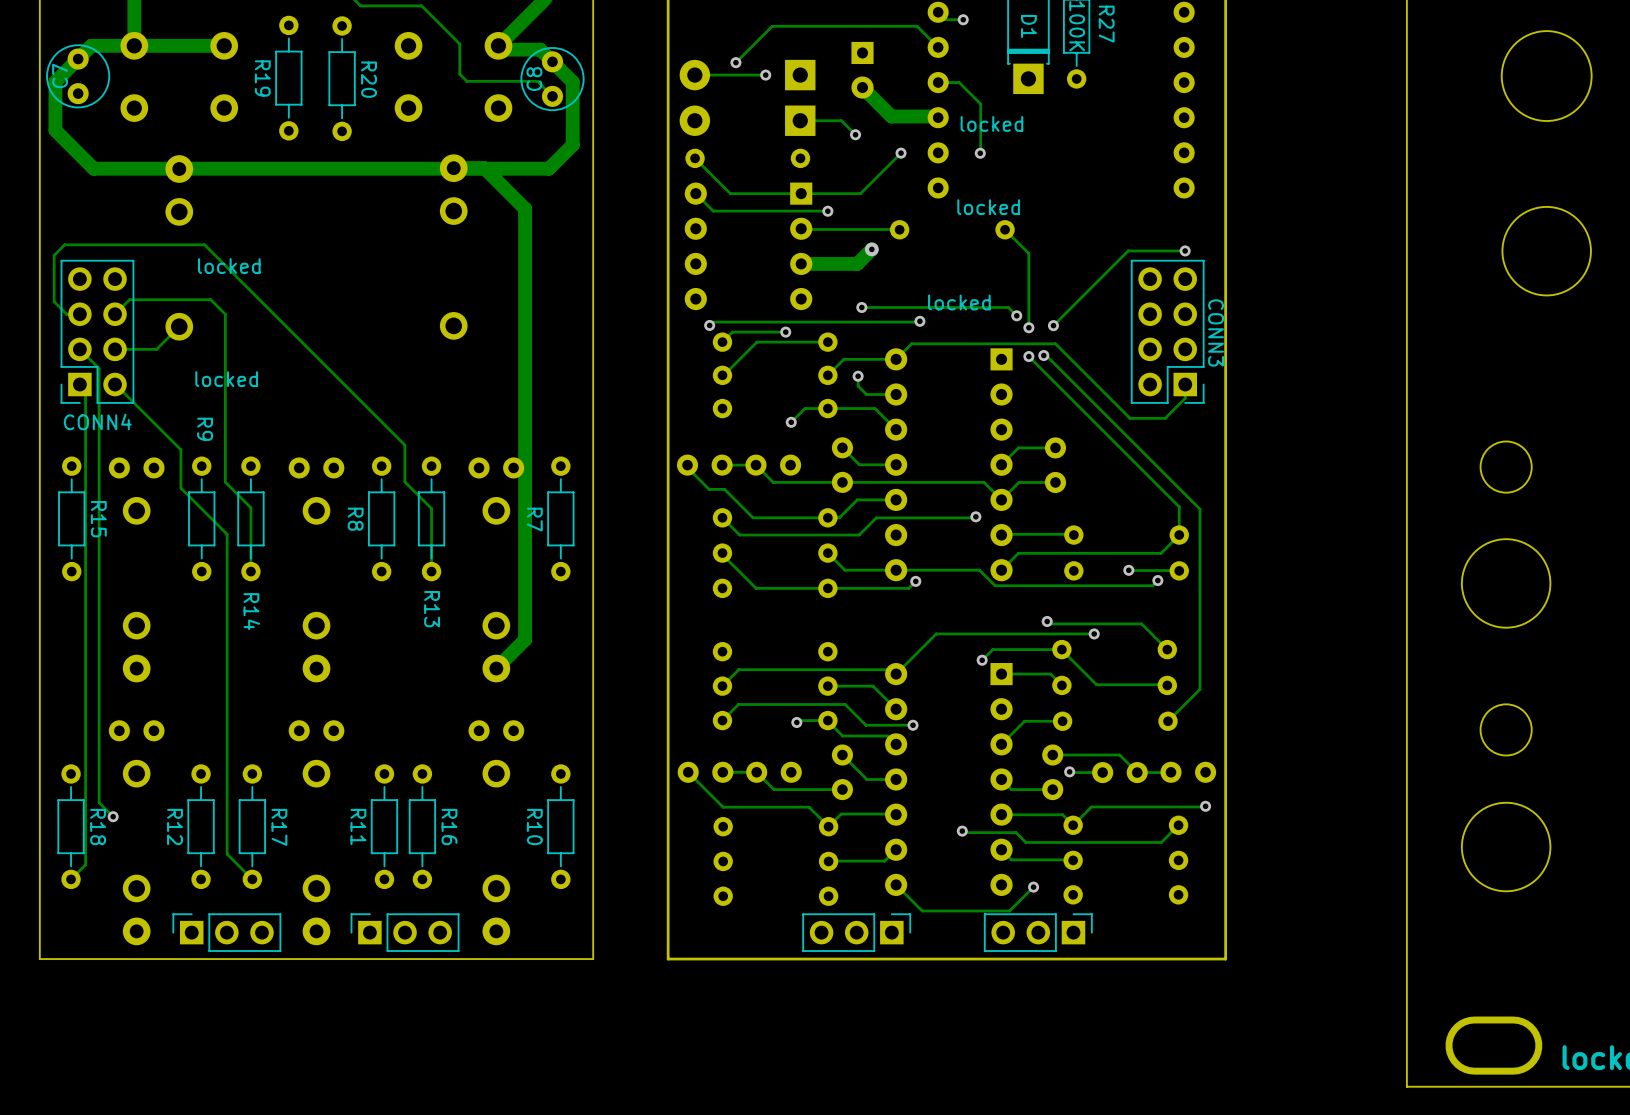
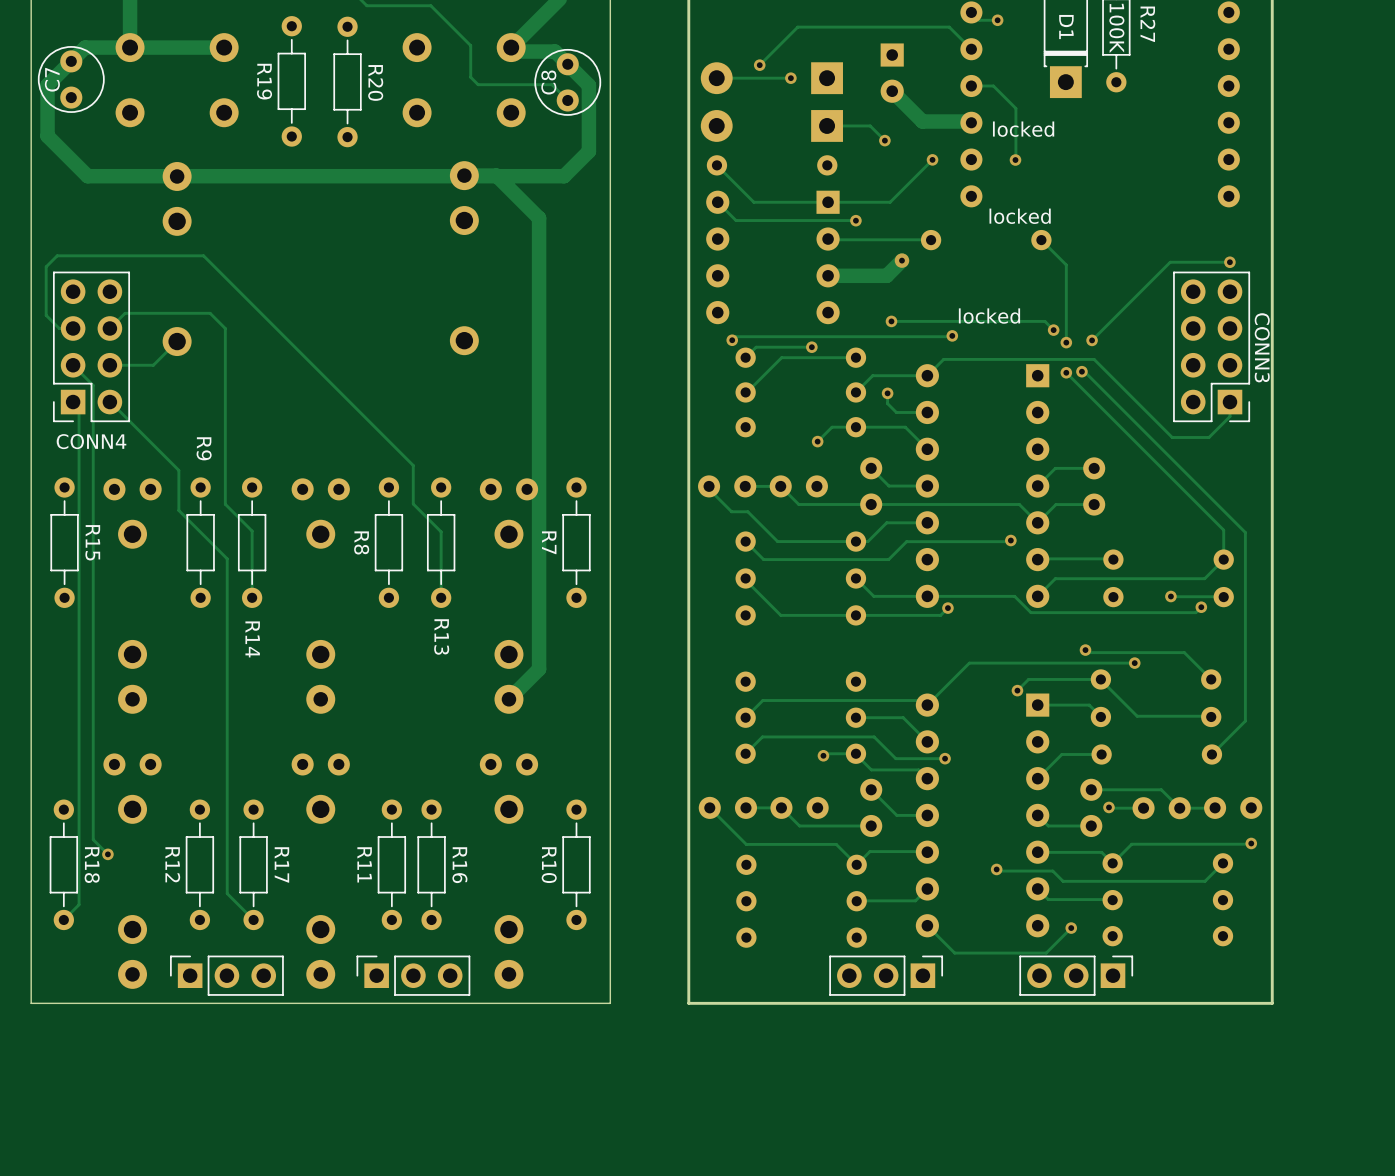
text: locked (229, 266) -> none
text: locked (226, 379) -> none

